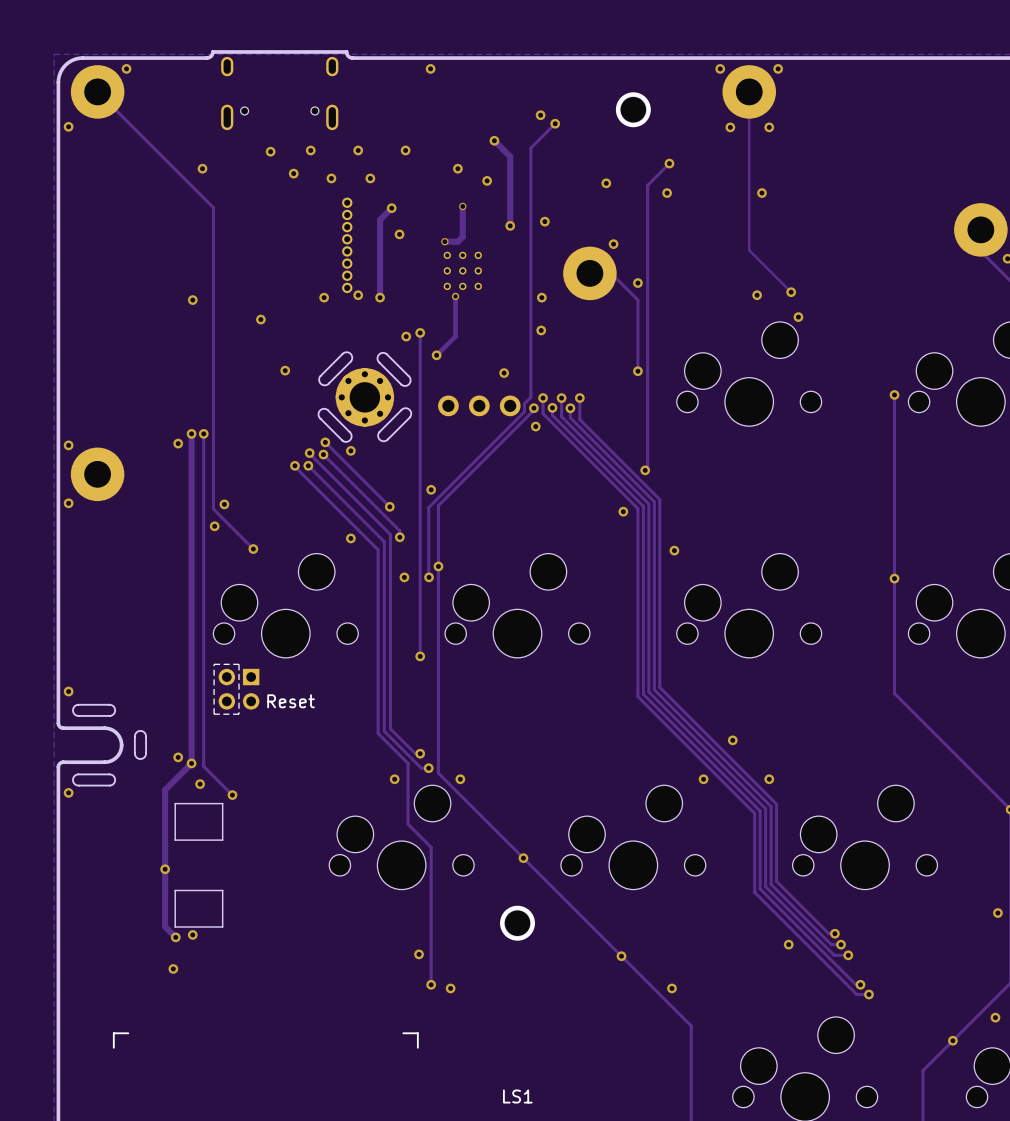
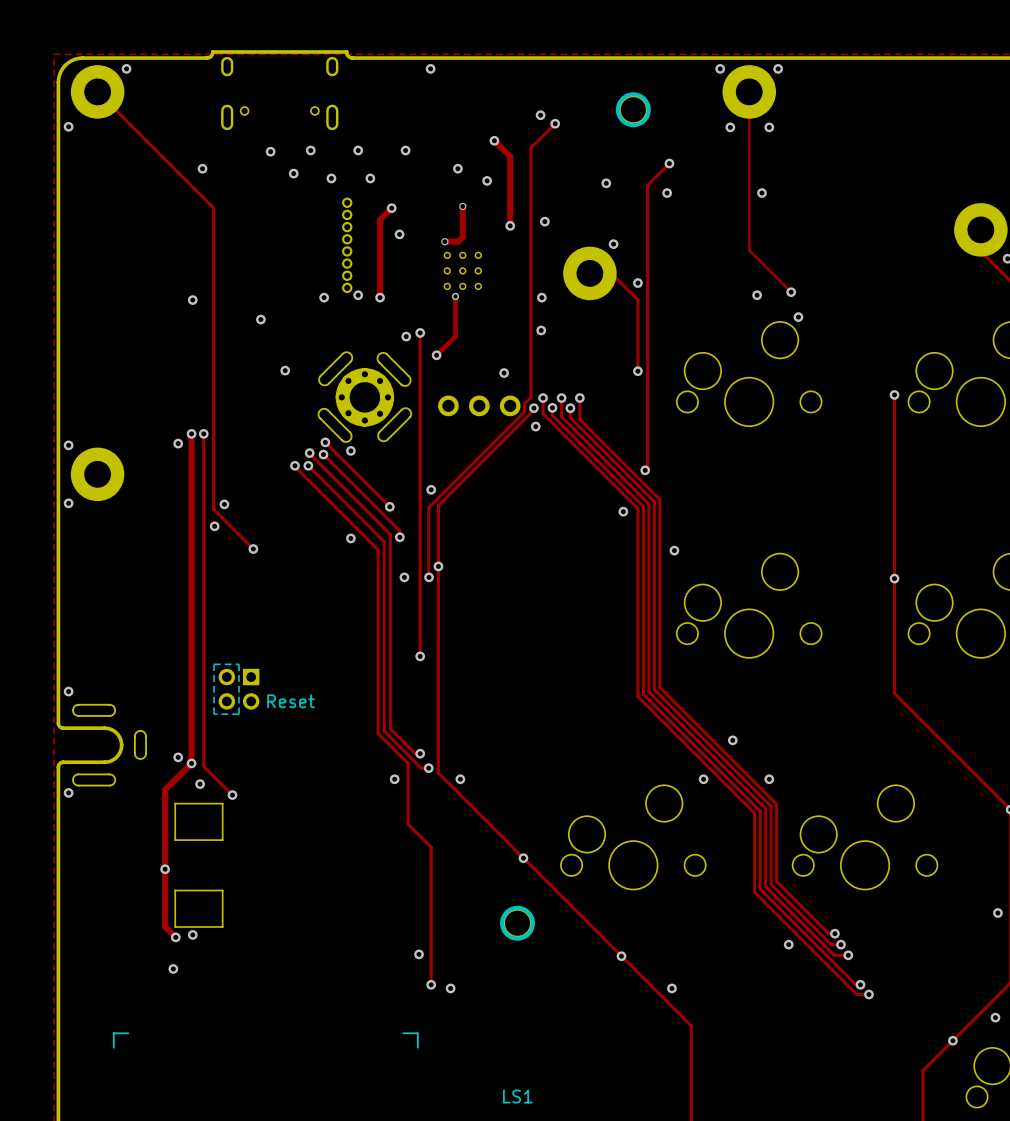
part: (285, 605) -> none
part: (517, 605) -> none
part: (401, 837) -> none
part: (805, 1069) -> none

